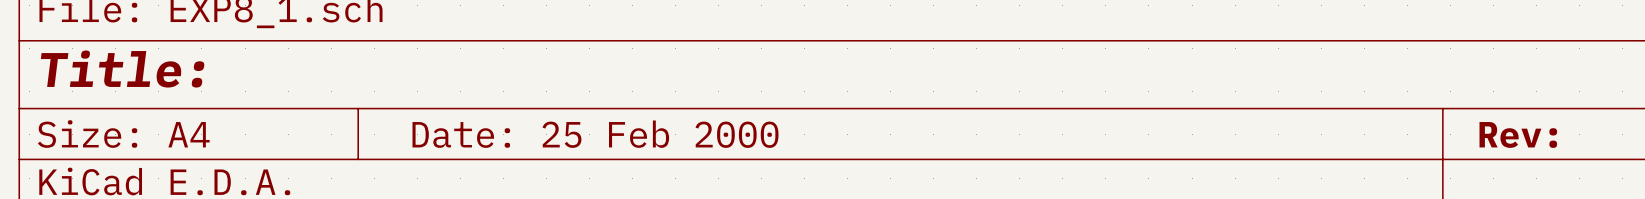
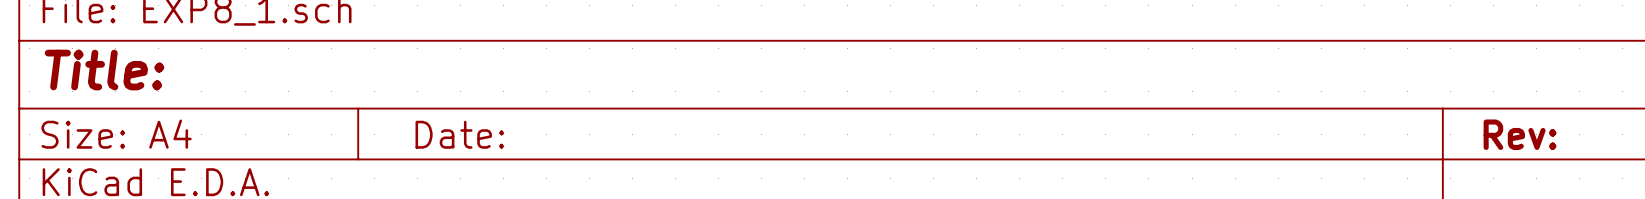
title block: Date: 25 Feb 2000 (595, 134) -> Date: (459, 134)

